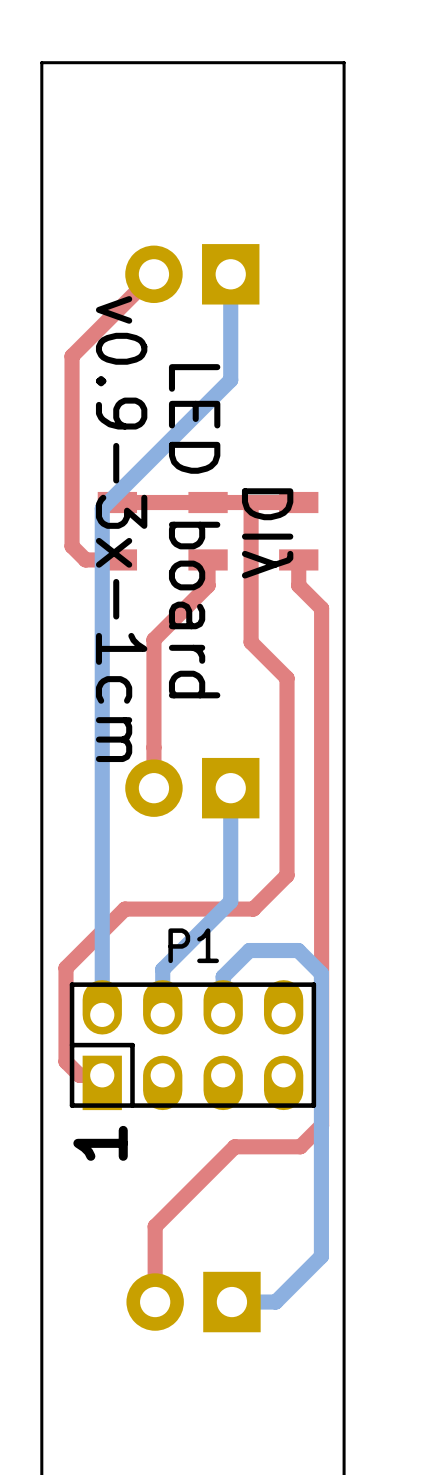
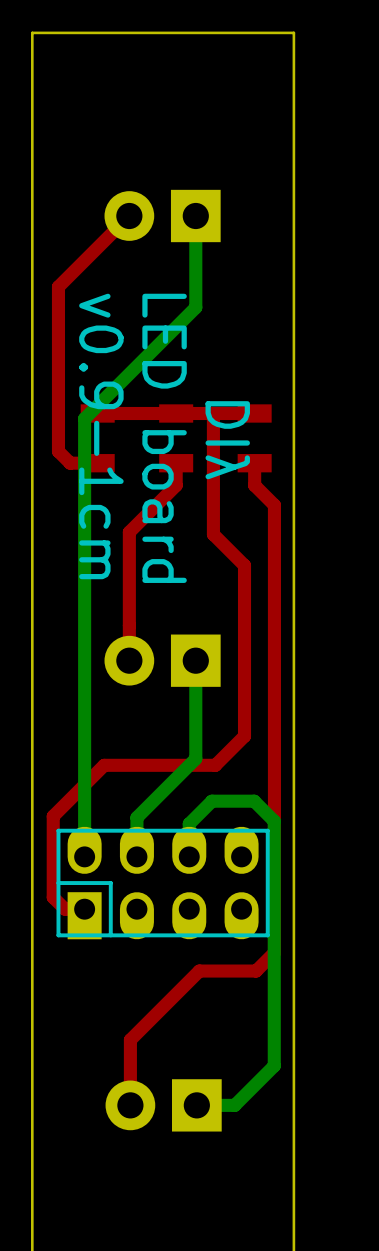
text: v0.9-3x-1cm (121, 529) -> v0.9-1cm (101, 436)
P1 name: P1 (193, 945) -> none
text: 1 (100, 1143) -> none

